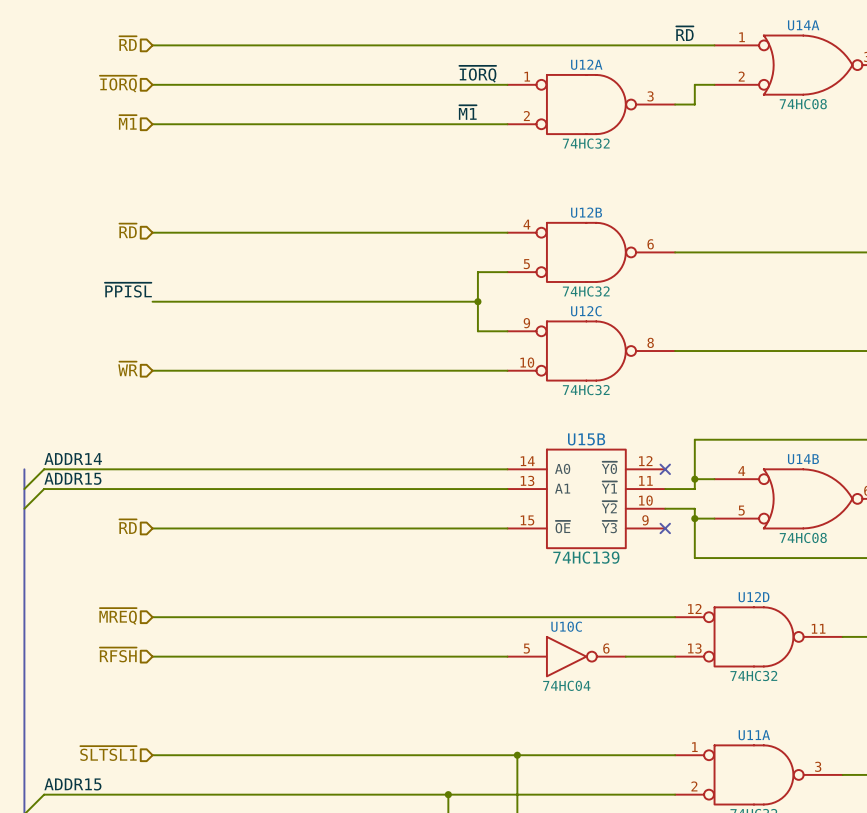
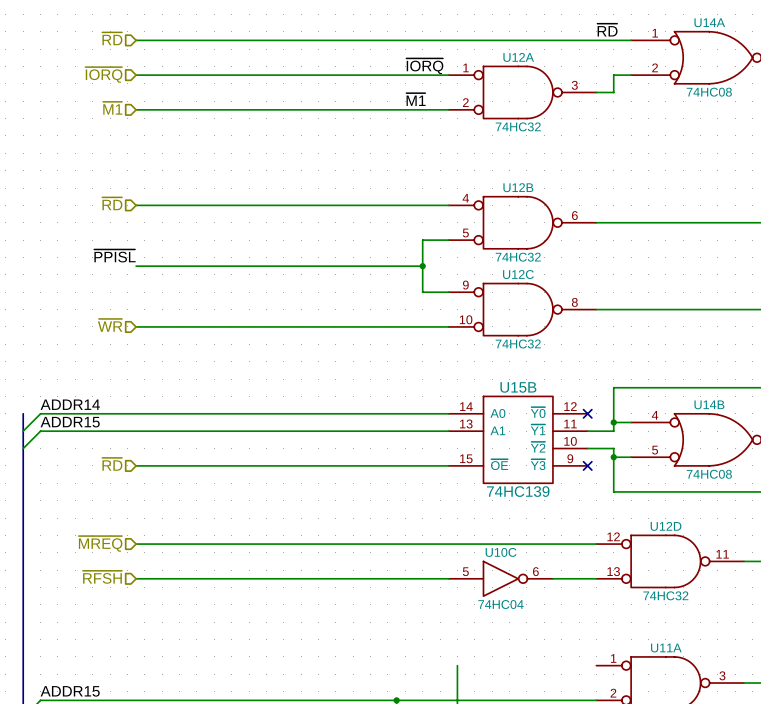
hierarchical label: ~{SLTSL1} (108, 753) -> none
wire: (152, 755) (675, 755) -> none
junction: (517, 755) -> none

